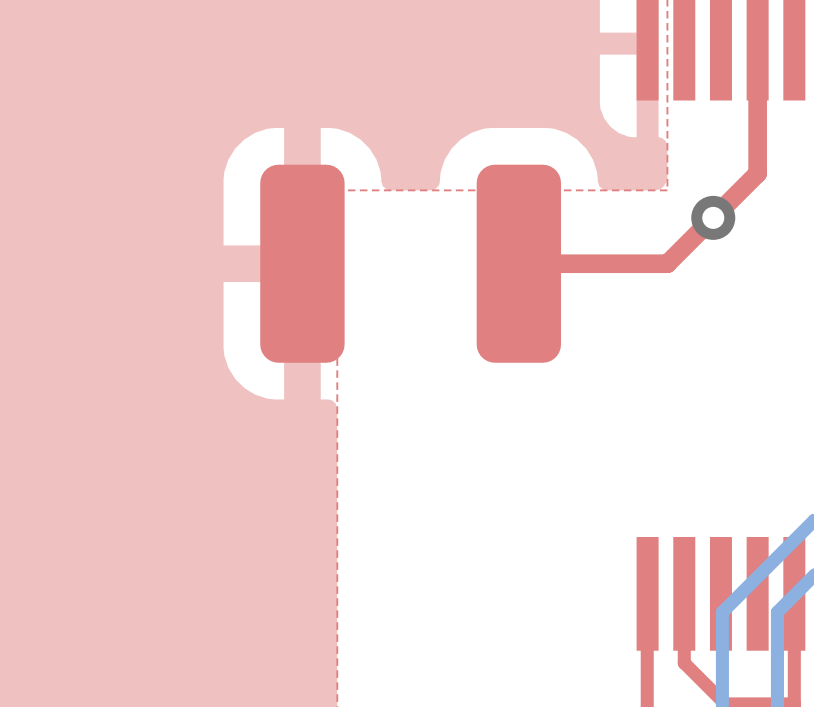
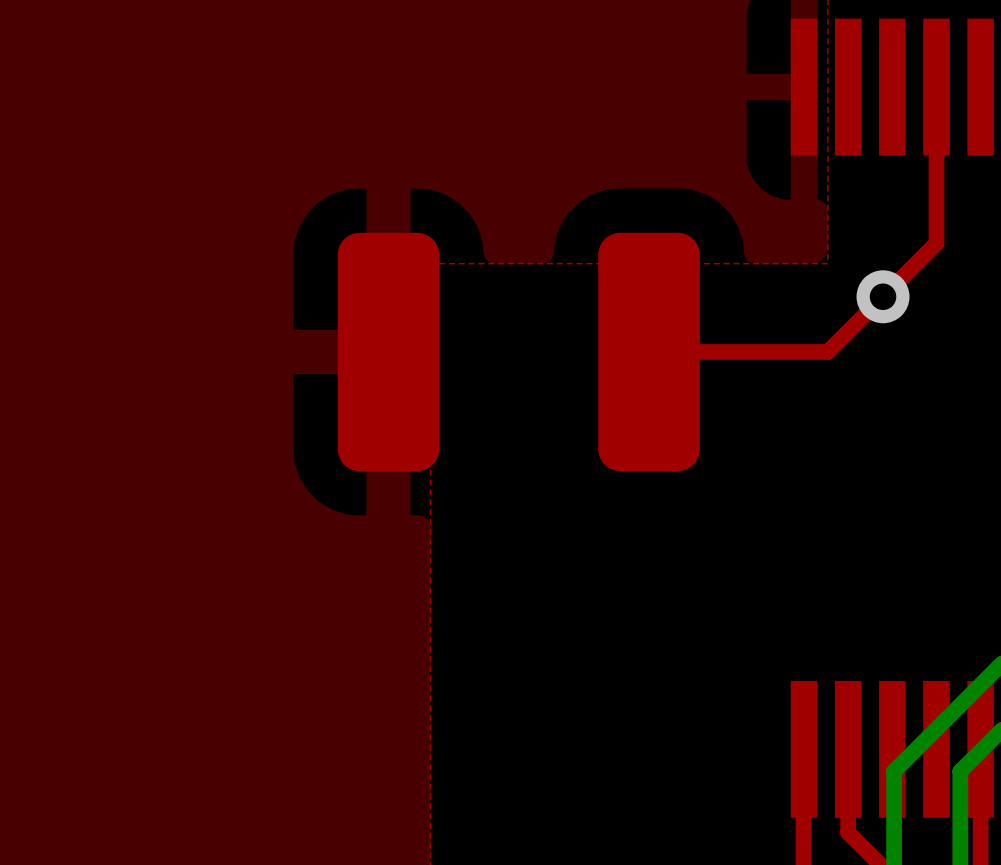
top track width: thick (757, 43) (757, 173) (667, 263) (518, 263) -> thin (936, 87) (936, 243) (827, 351) (649, 351)

